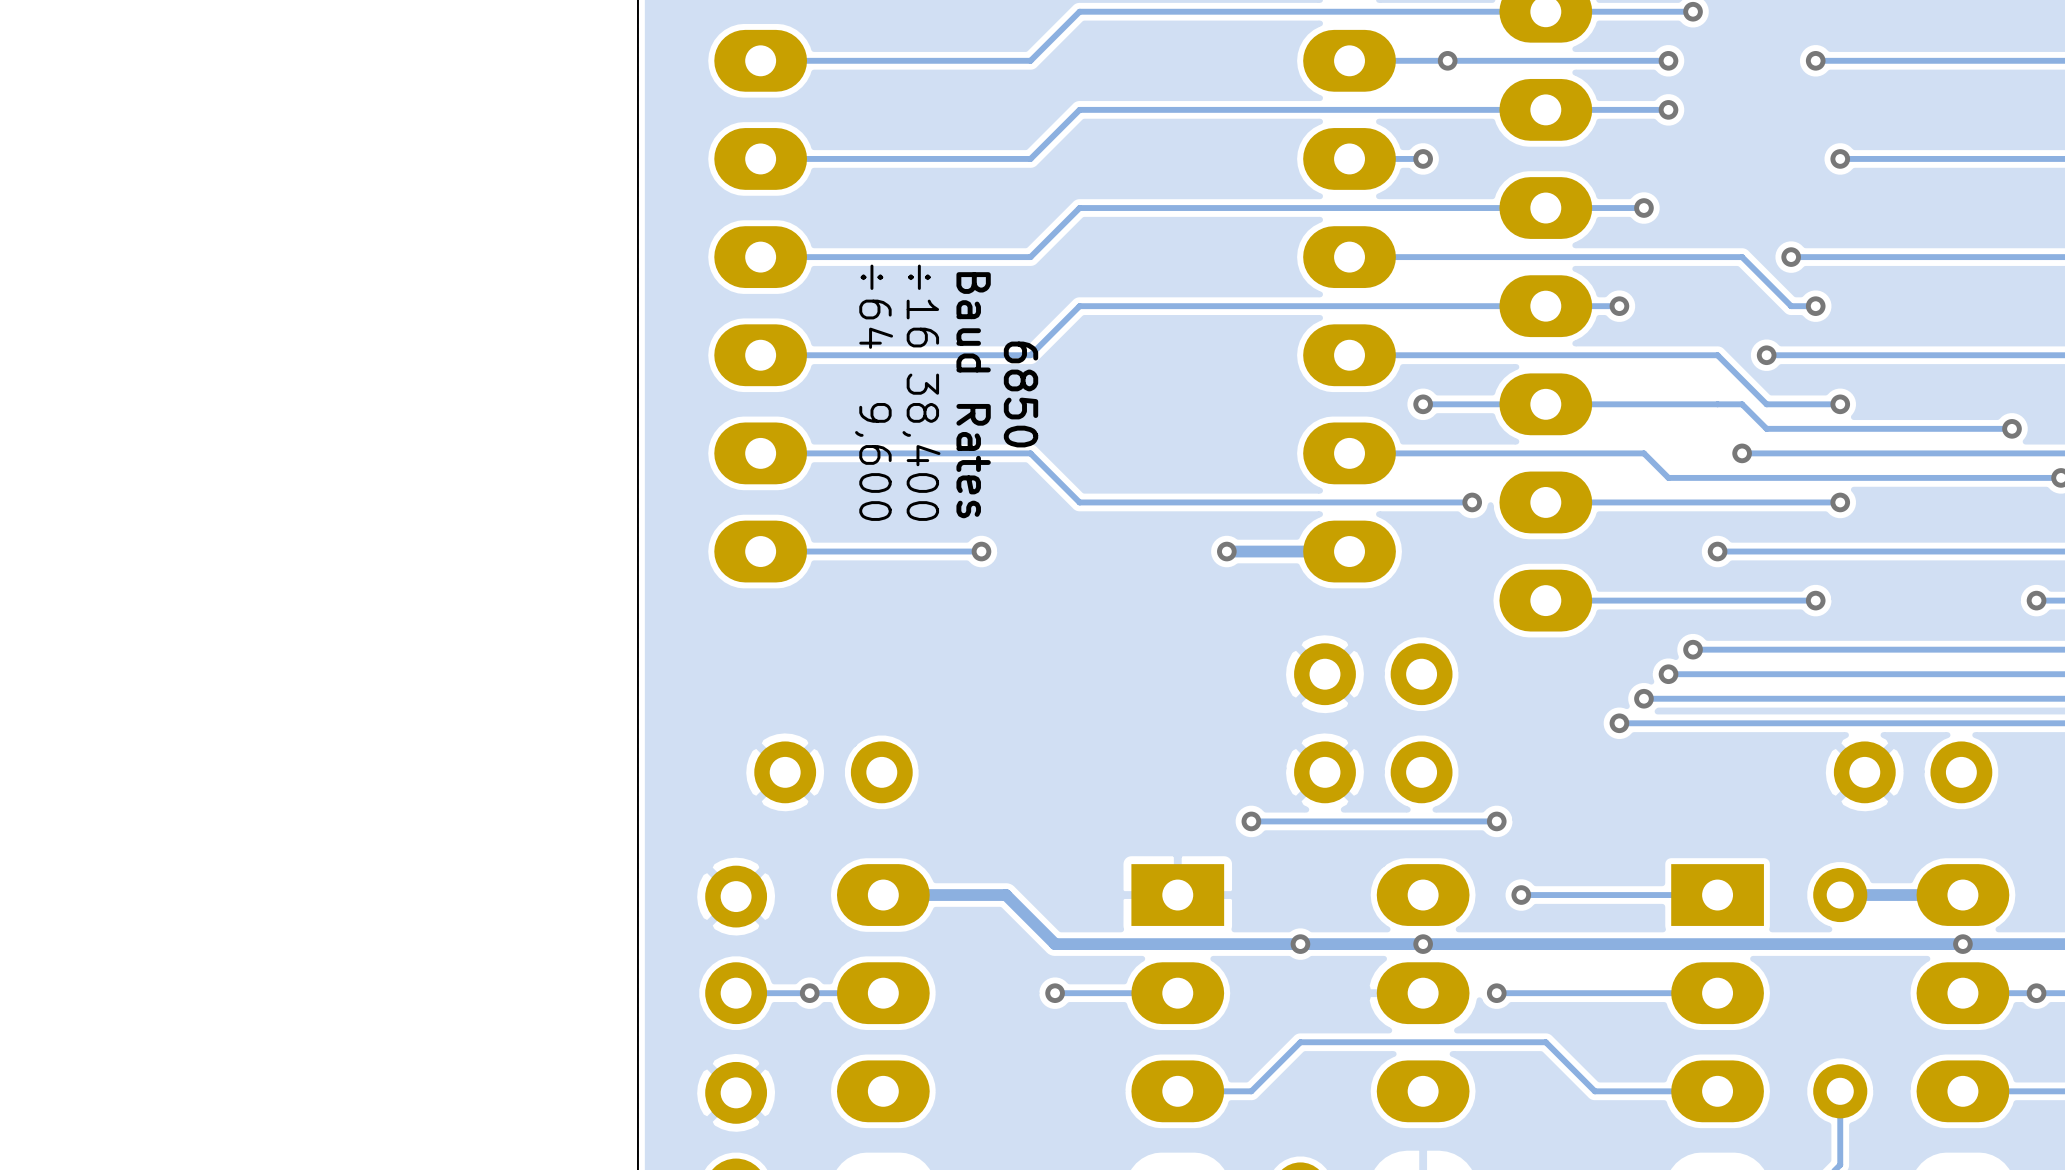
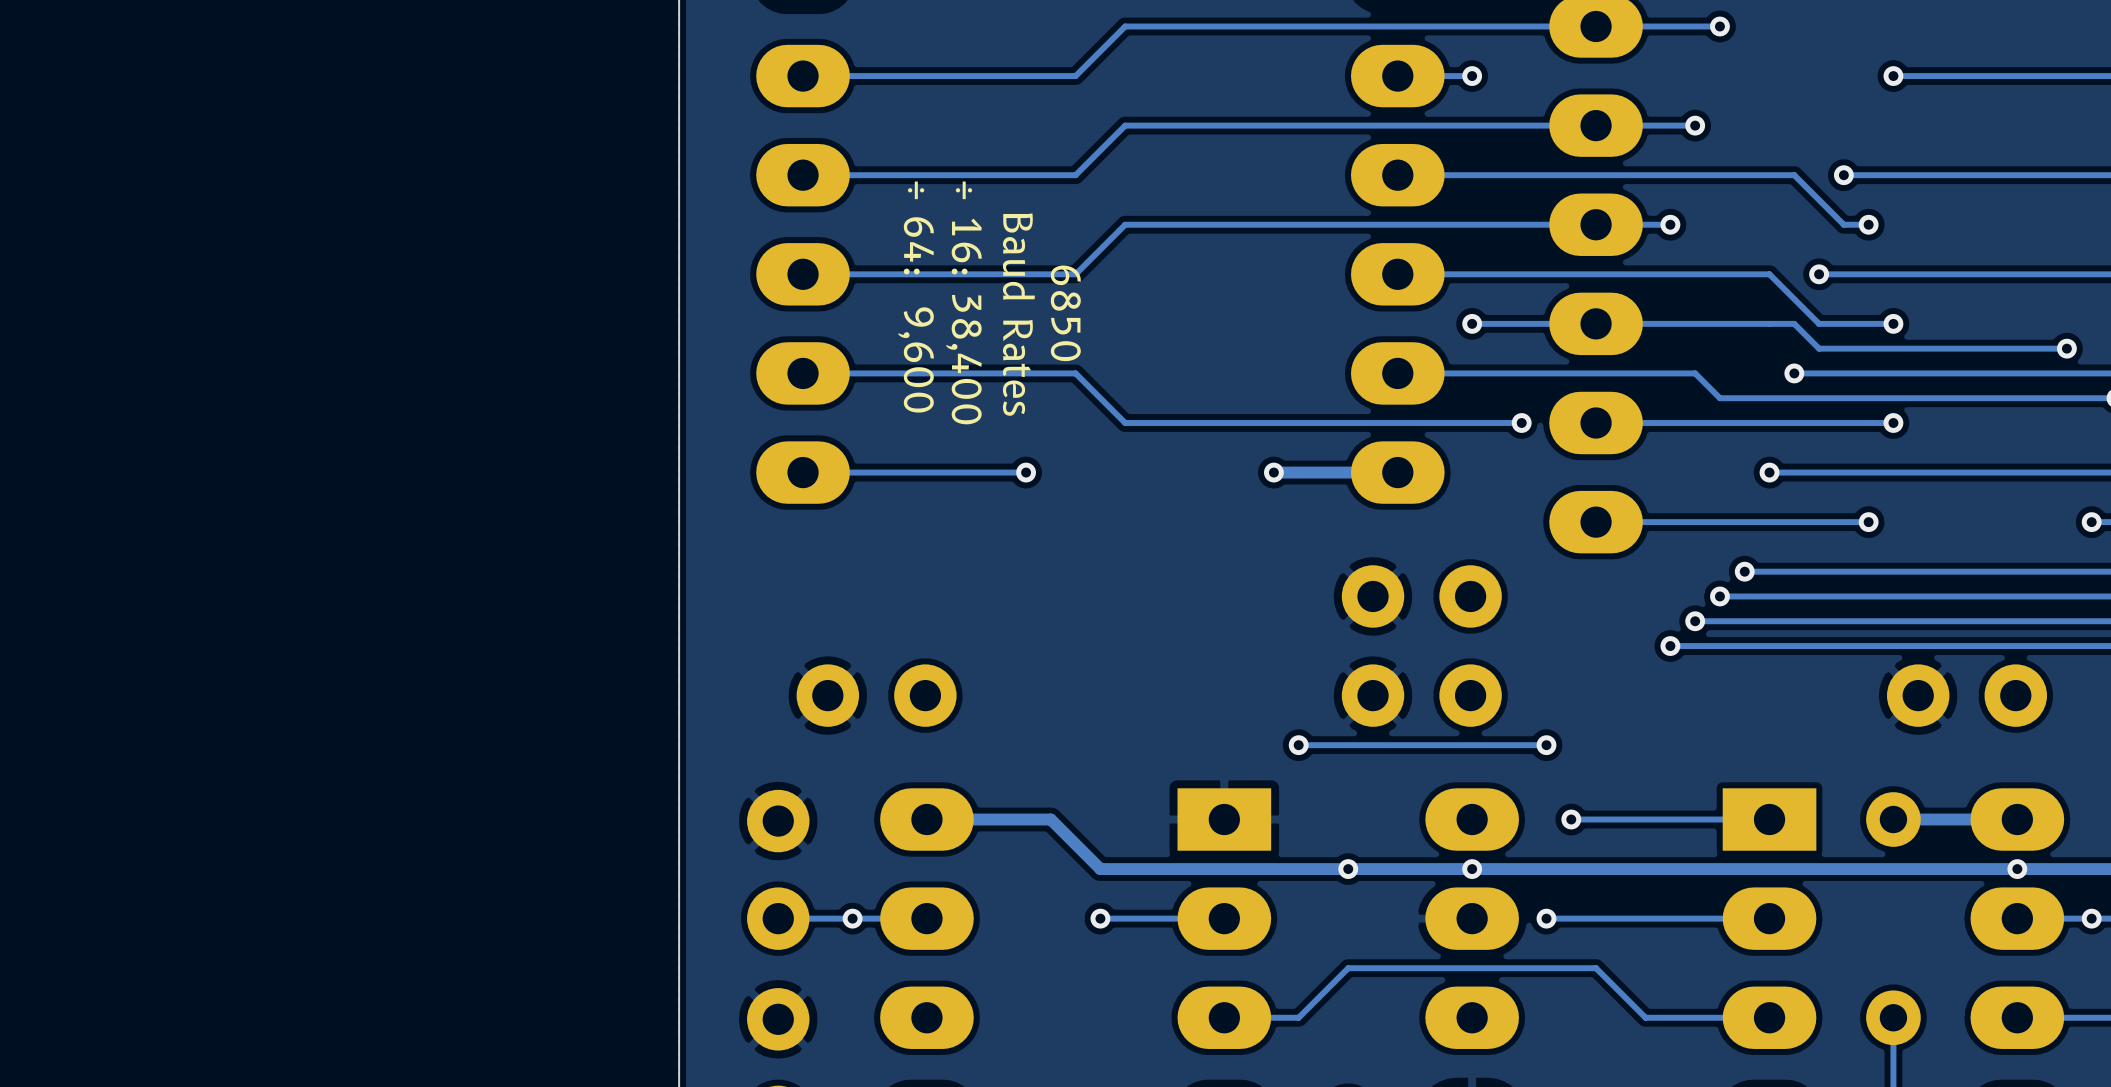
text: ÷64 (876, 306) -> ÷ 64: 9,600 (916, 297)
text: ÷16 (922, 306) -> ÷ 16: 38,400 (963, 302)
text: 38,400 (921, 447) -> none
text: 9,600 (873, 461) -> none

